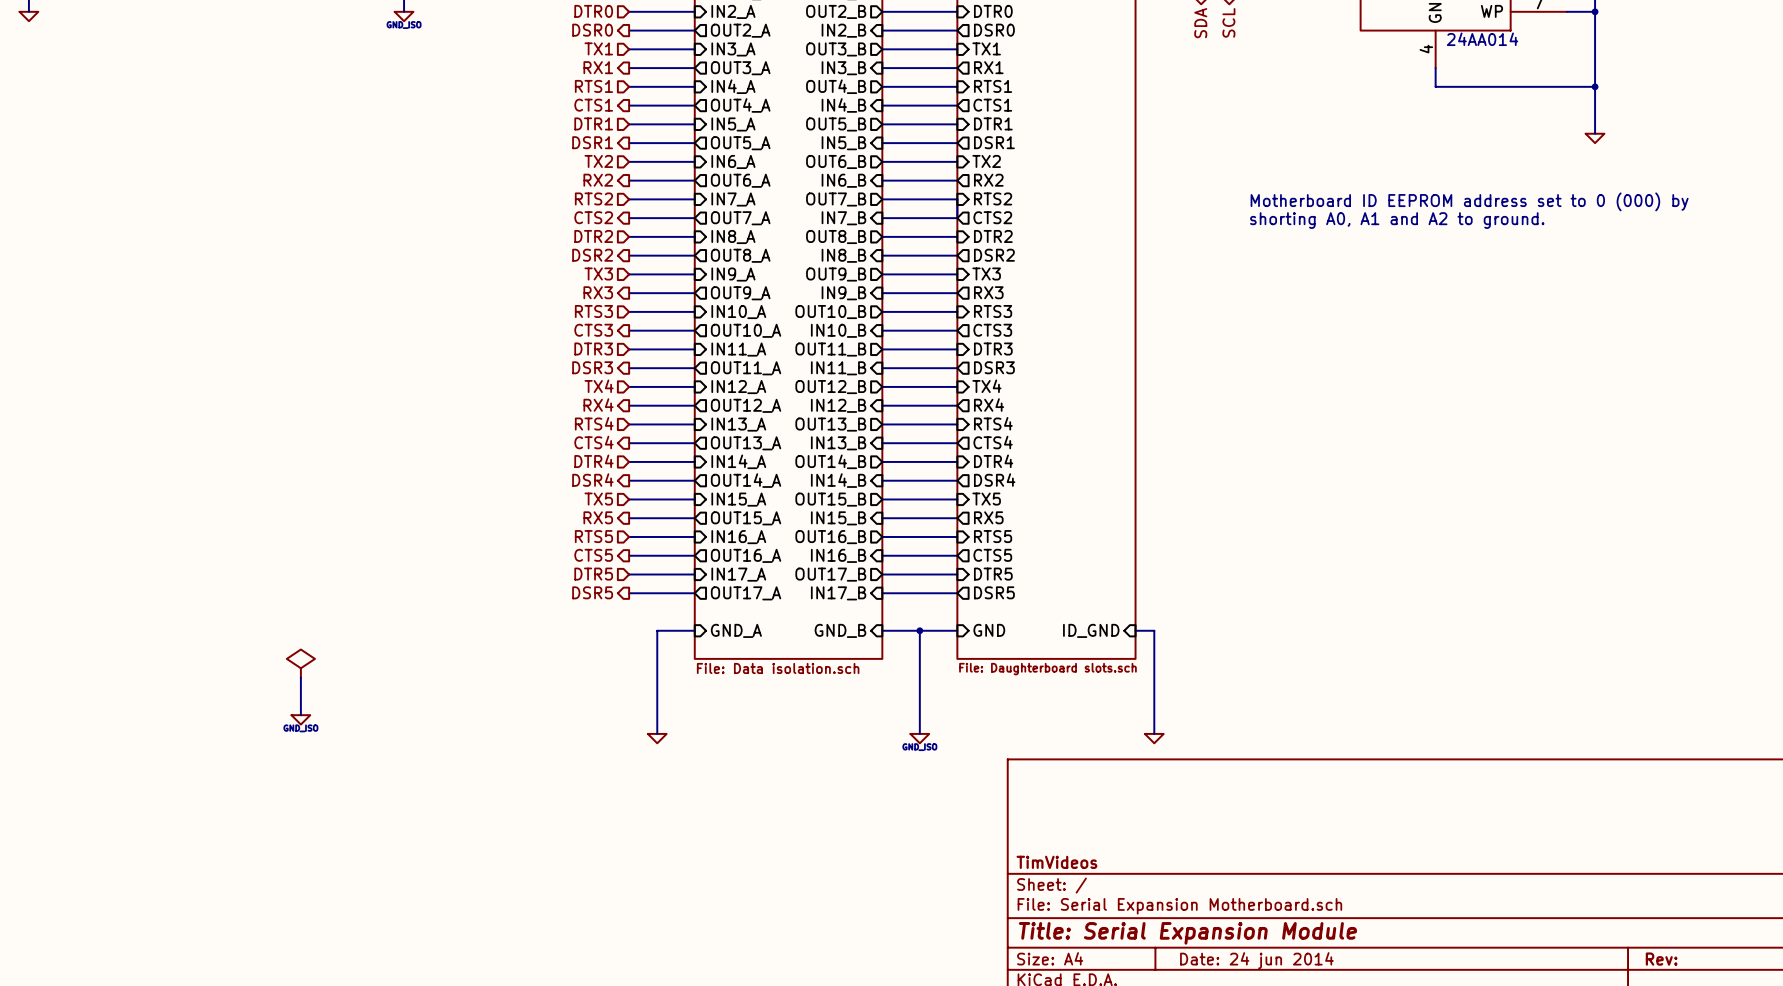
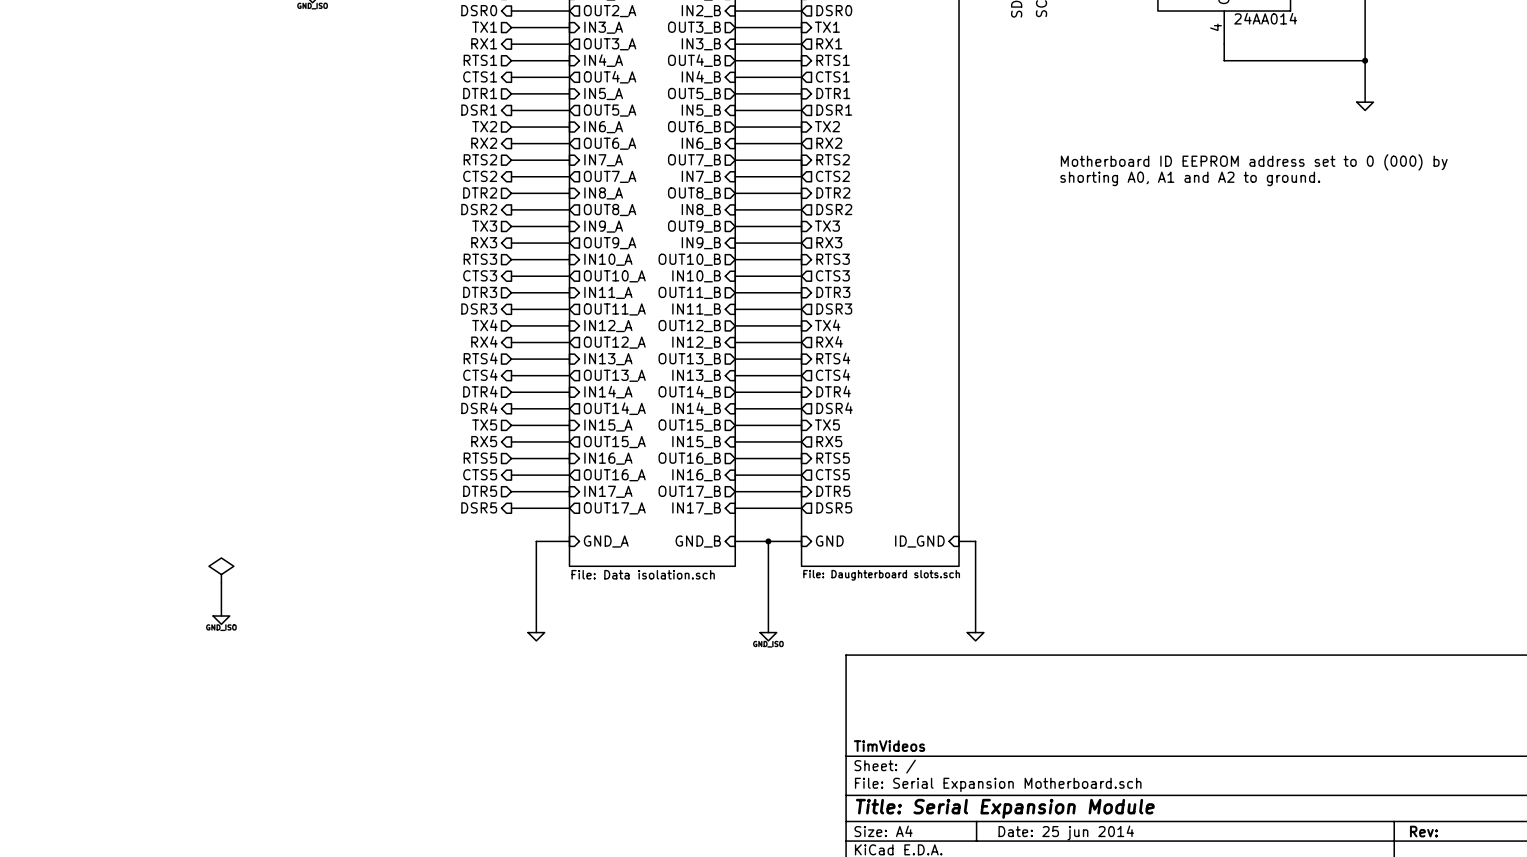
title block: Date: 24 jun 2014 (1256, 960) -> Date: 25 jun 2014 (1066, 832)

